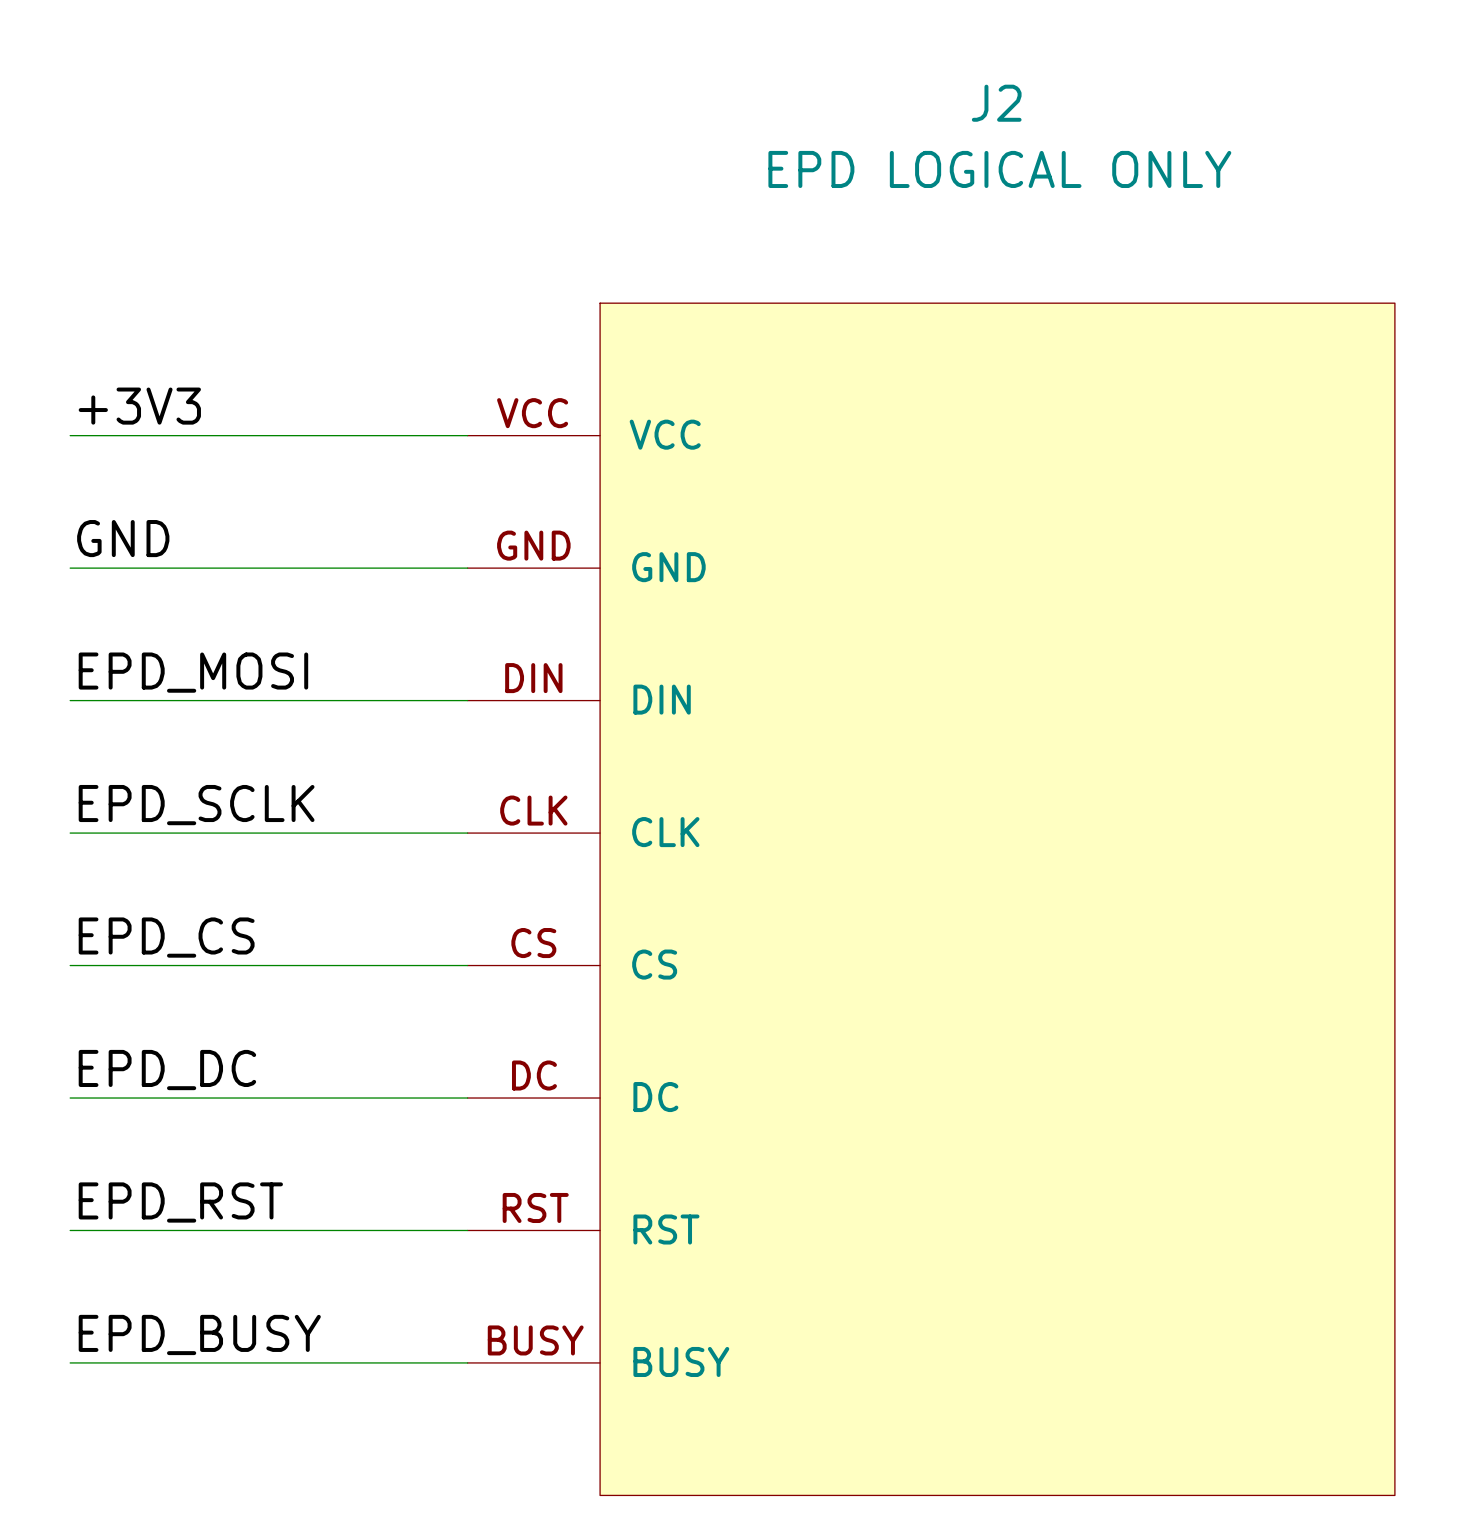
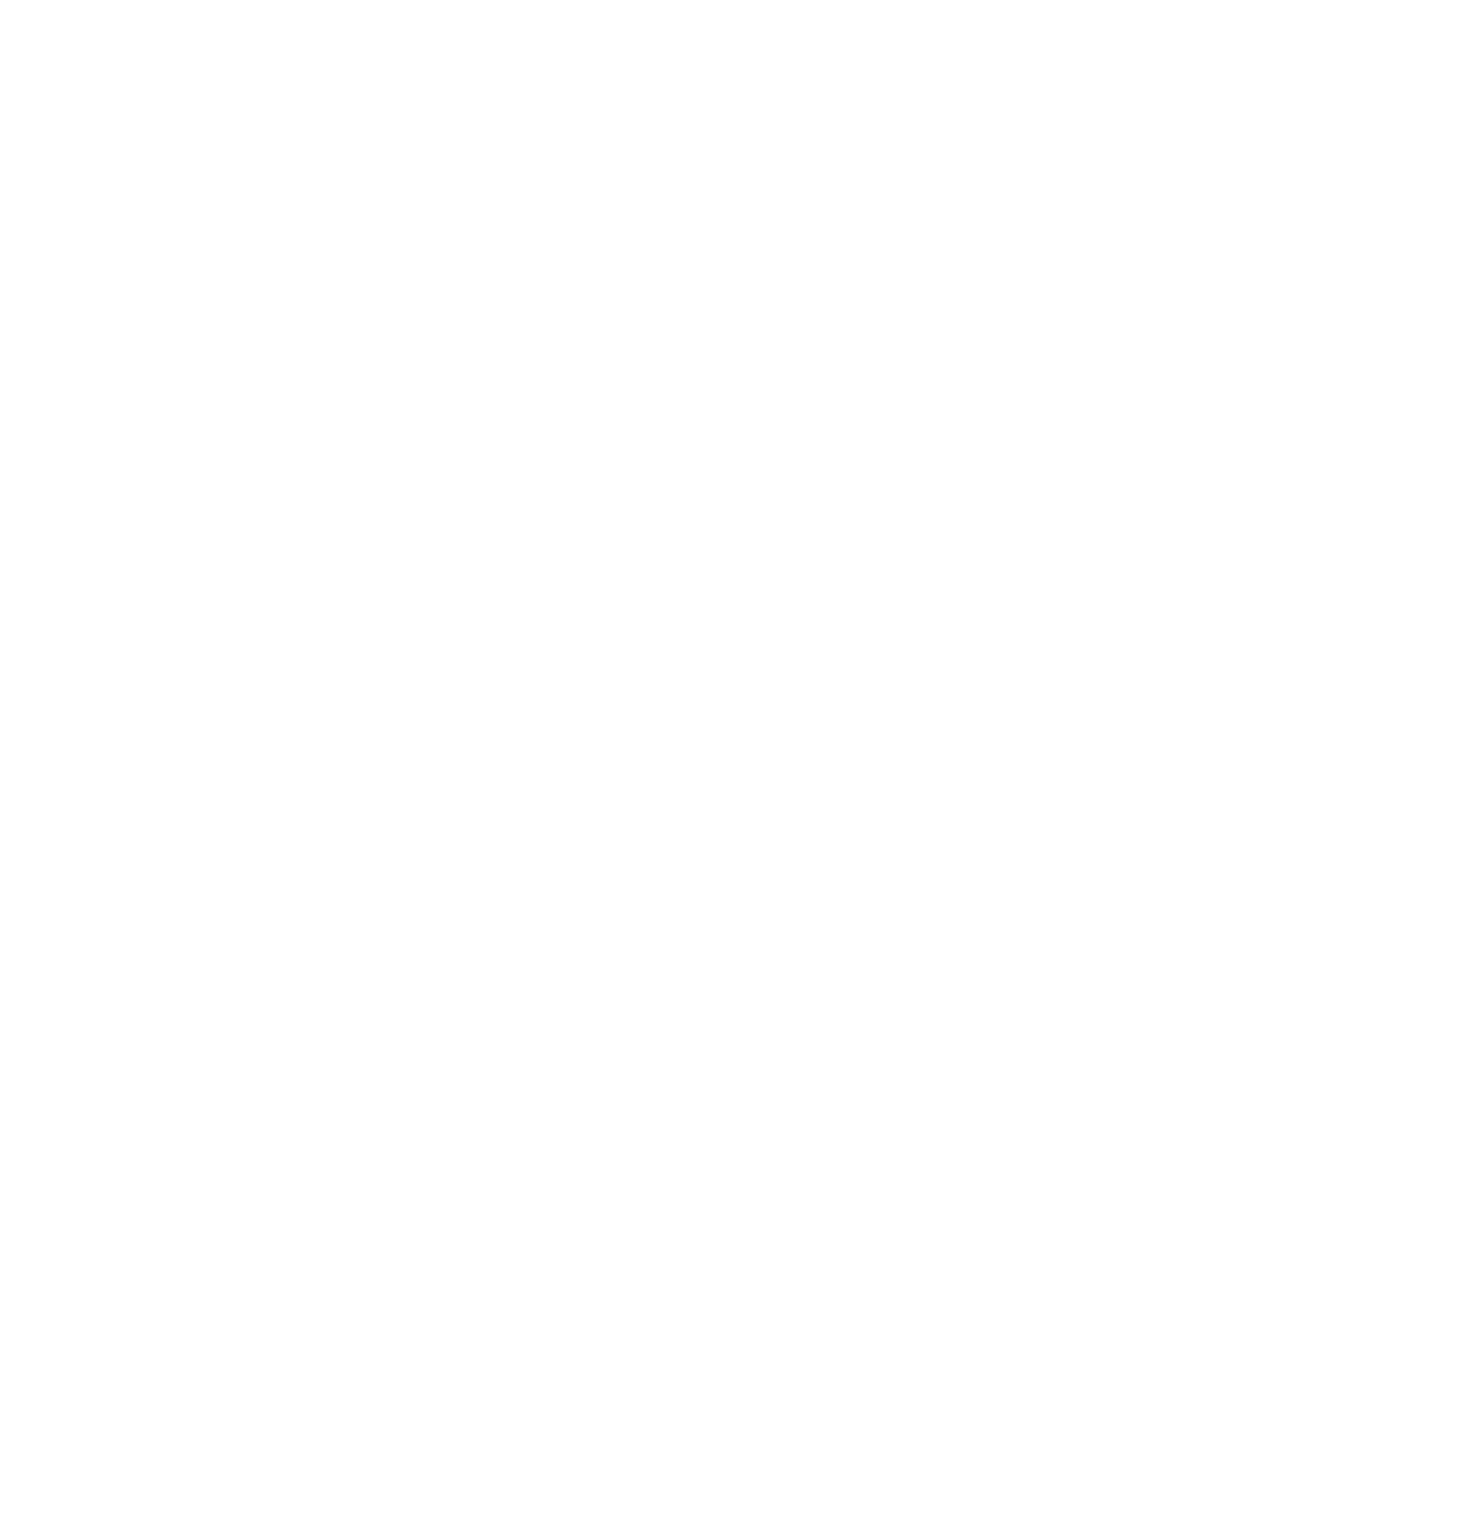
label: +3V3 (139, 406) -> none
wire: (70, 435) (467, 435) -> none
label: GND (123, 538) -> none
wire: (70, 568) (467, 568) -> none
label: EPD_MOSI (193, 672) -> none
wire: (70, 700) (467, 700) -> none
label: EPD_SCLK (196, 805) -> none
wire: (70, 833) (467, 833) -> none
J2: EPD LOGICAL ONLY (931, 899) -> none
label: EPD_CS (166, 937) -> none
wire: (70, 965) (467, 965) -> none
label: EPD_DC (167, 1070) -> none
wire: (70, 1098) (467, 1098) -> none
label: EPD_RST (180, 1202) -> none
wire: (70, 1230) (467, 1230) -> none
label: EPD_BUSY (199, 1334) -> none
wire: (70, 1362) (467, 1362) -> none

